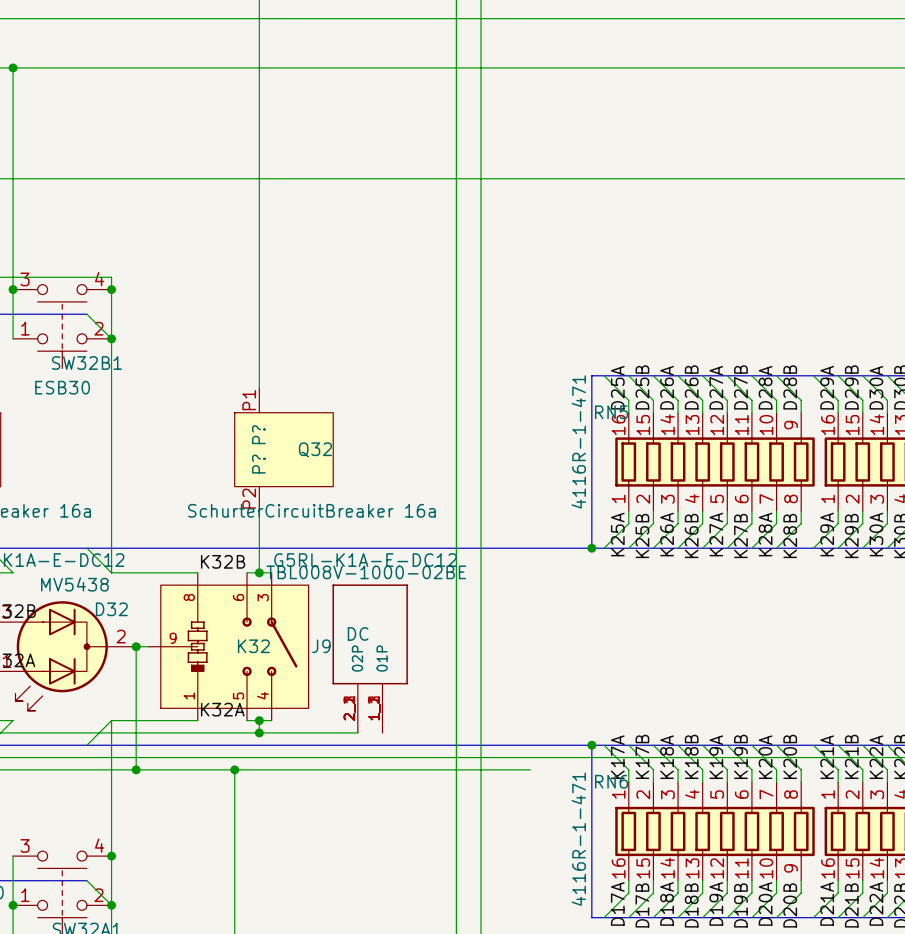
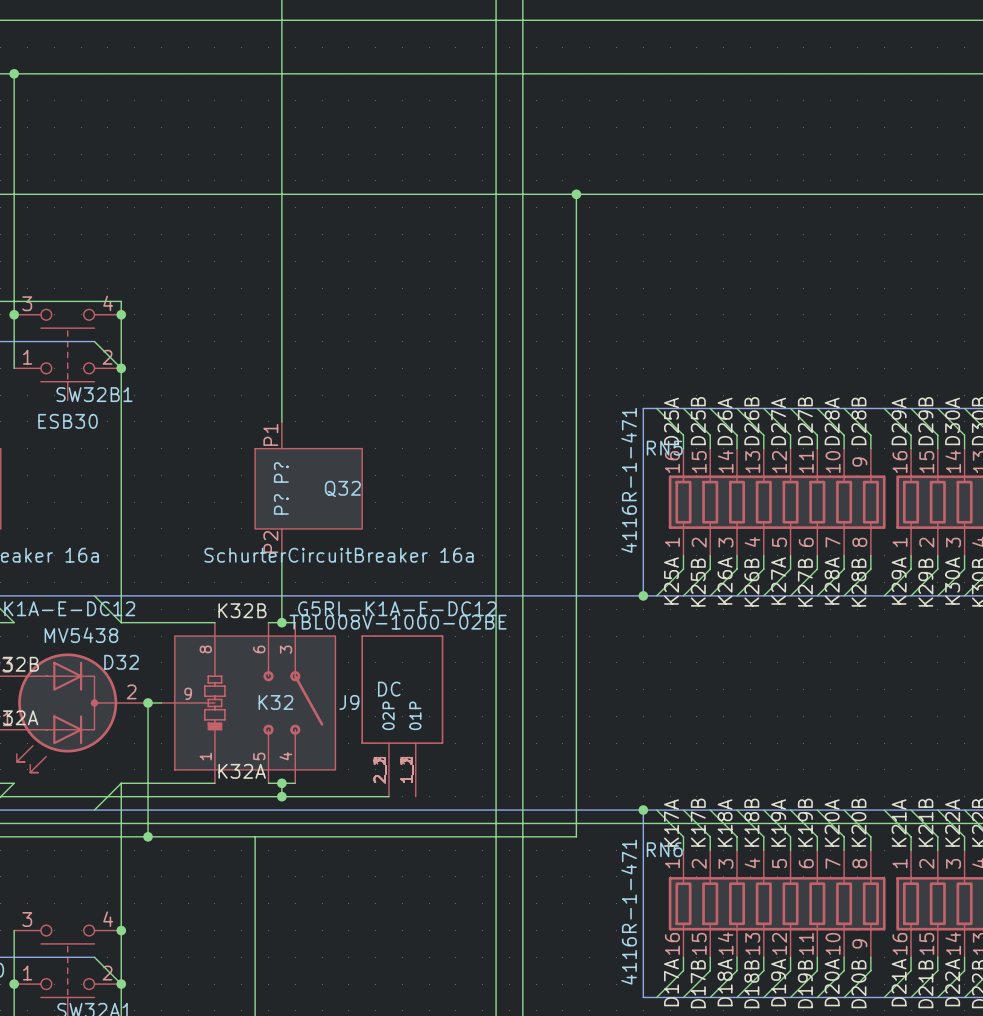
wire: none -> (576, 194) (576, 836)
junction: none -> (576, 194)
junction: (234, 769) -> none

